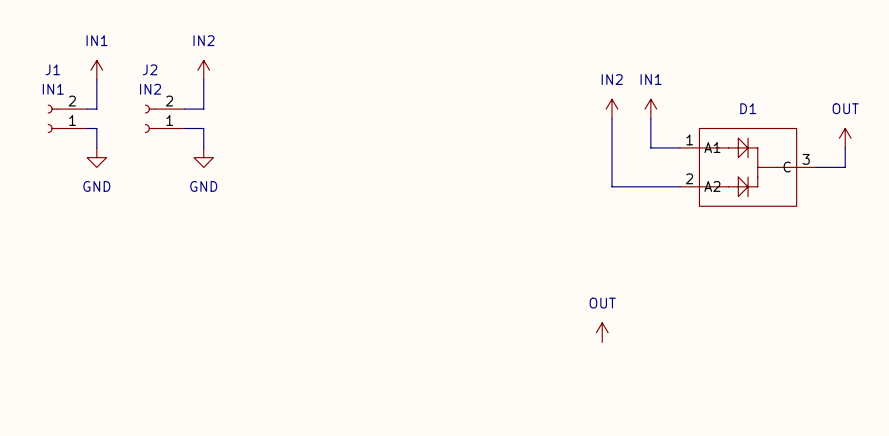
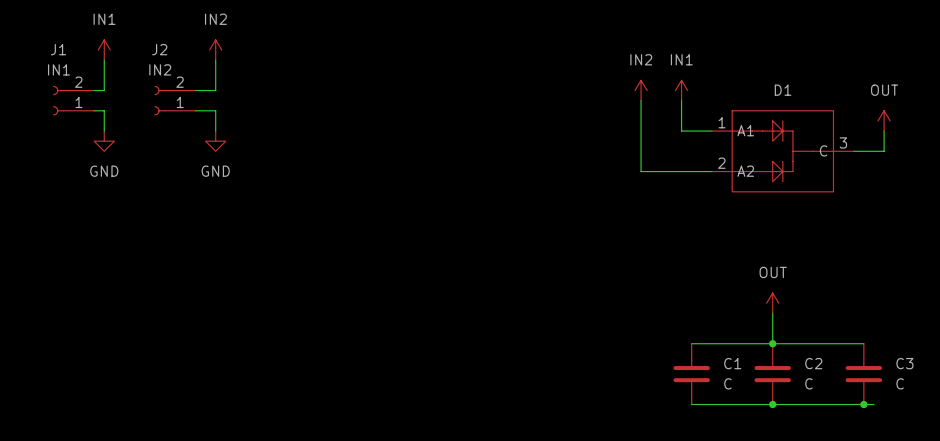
wire: none -> (772, 313) (772, 343)
power symbol position: OUT (602, 332) -> OUT (772, 303)
wire: none -> (691, 343) (863, 343)
junction: none -> (772, 343)
C1: none -> C (691, 374)
C2: none -> C (772, 374)
C3: none -> C (863, 374)
wire: none -> (691, 404) (873, 404)
junction: none -> (772, 404)
junction: none -> (863, 404)

